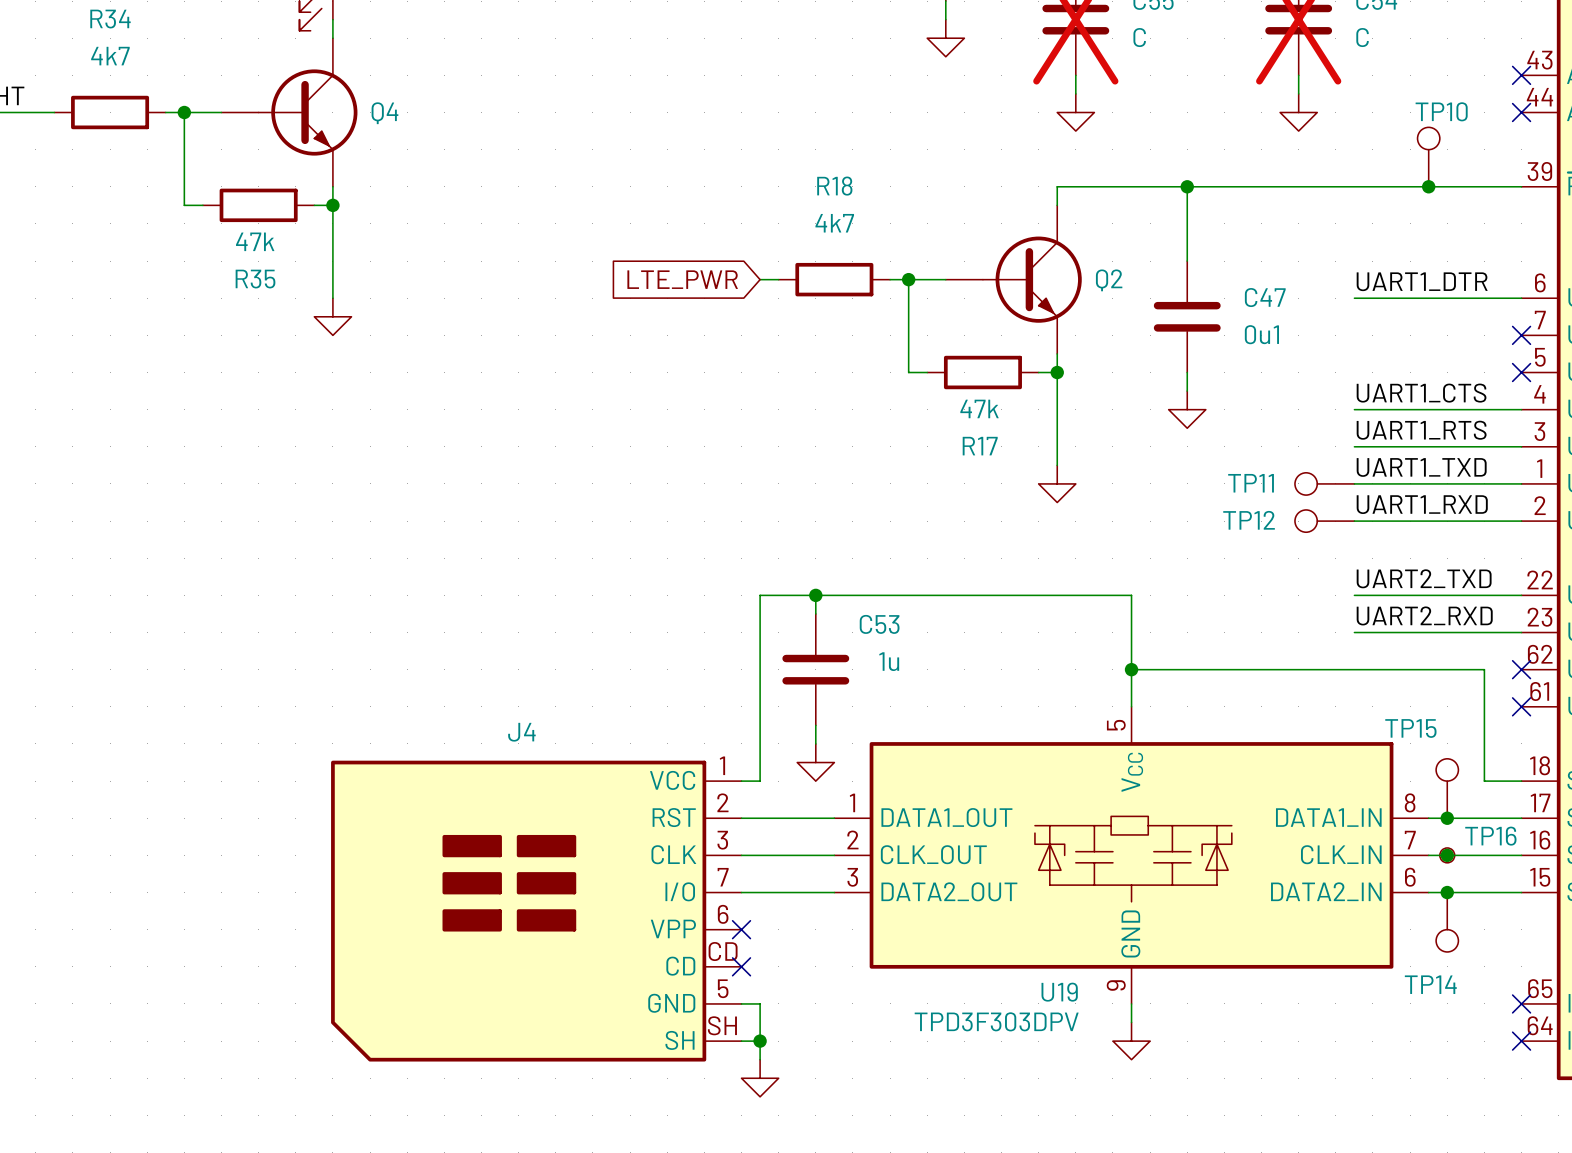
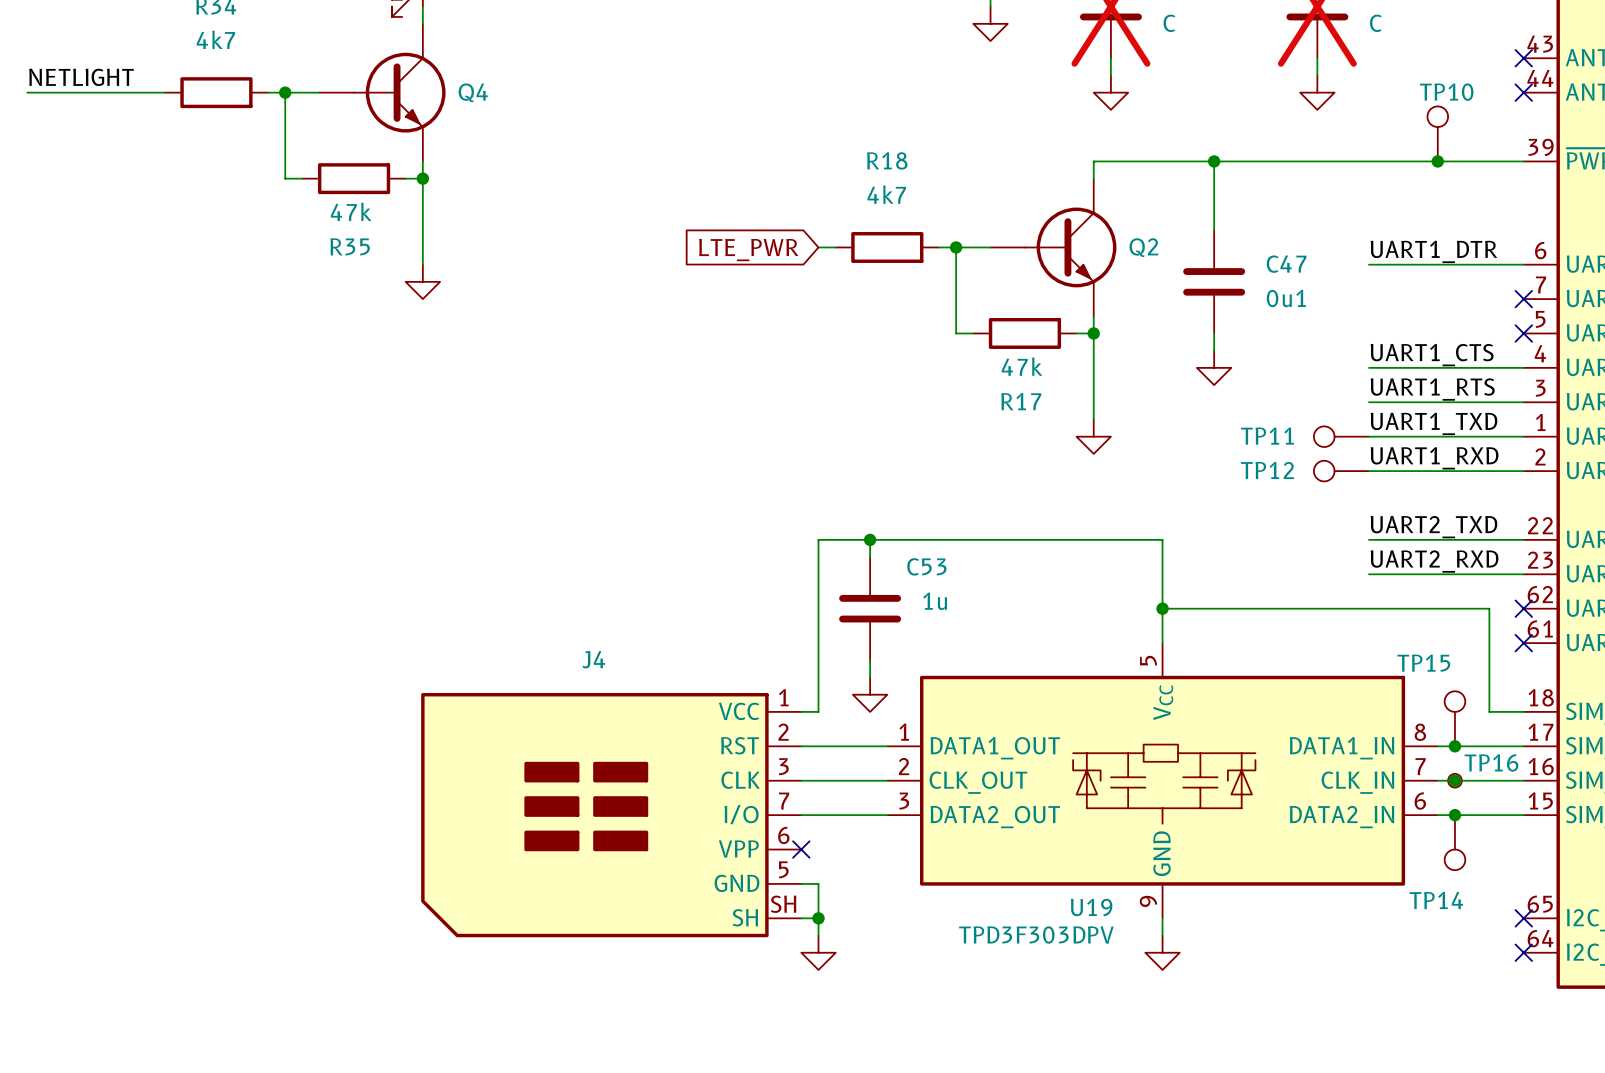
J4 symbol: [331, 760, 742, 1062] -> [421, 692, 802, 938]
wire: none -> (801, 883) (818, 883) (818, 918)
no-connect mark: (741, 966) -> none
junction position: (760, 1041) -> (818, 918)
power symbol position: (760, 1078) -> (818, 952)

